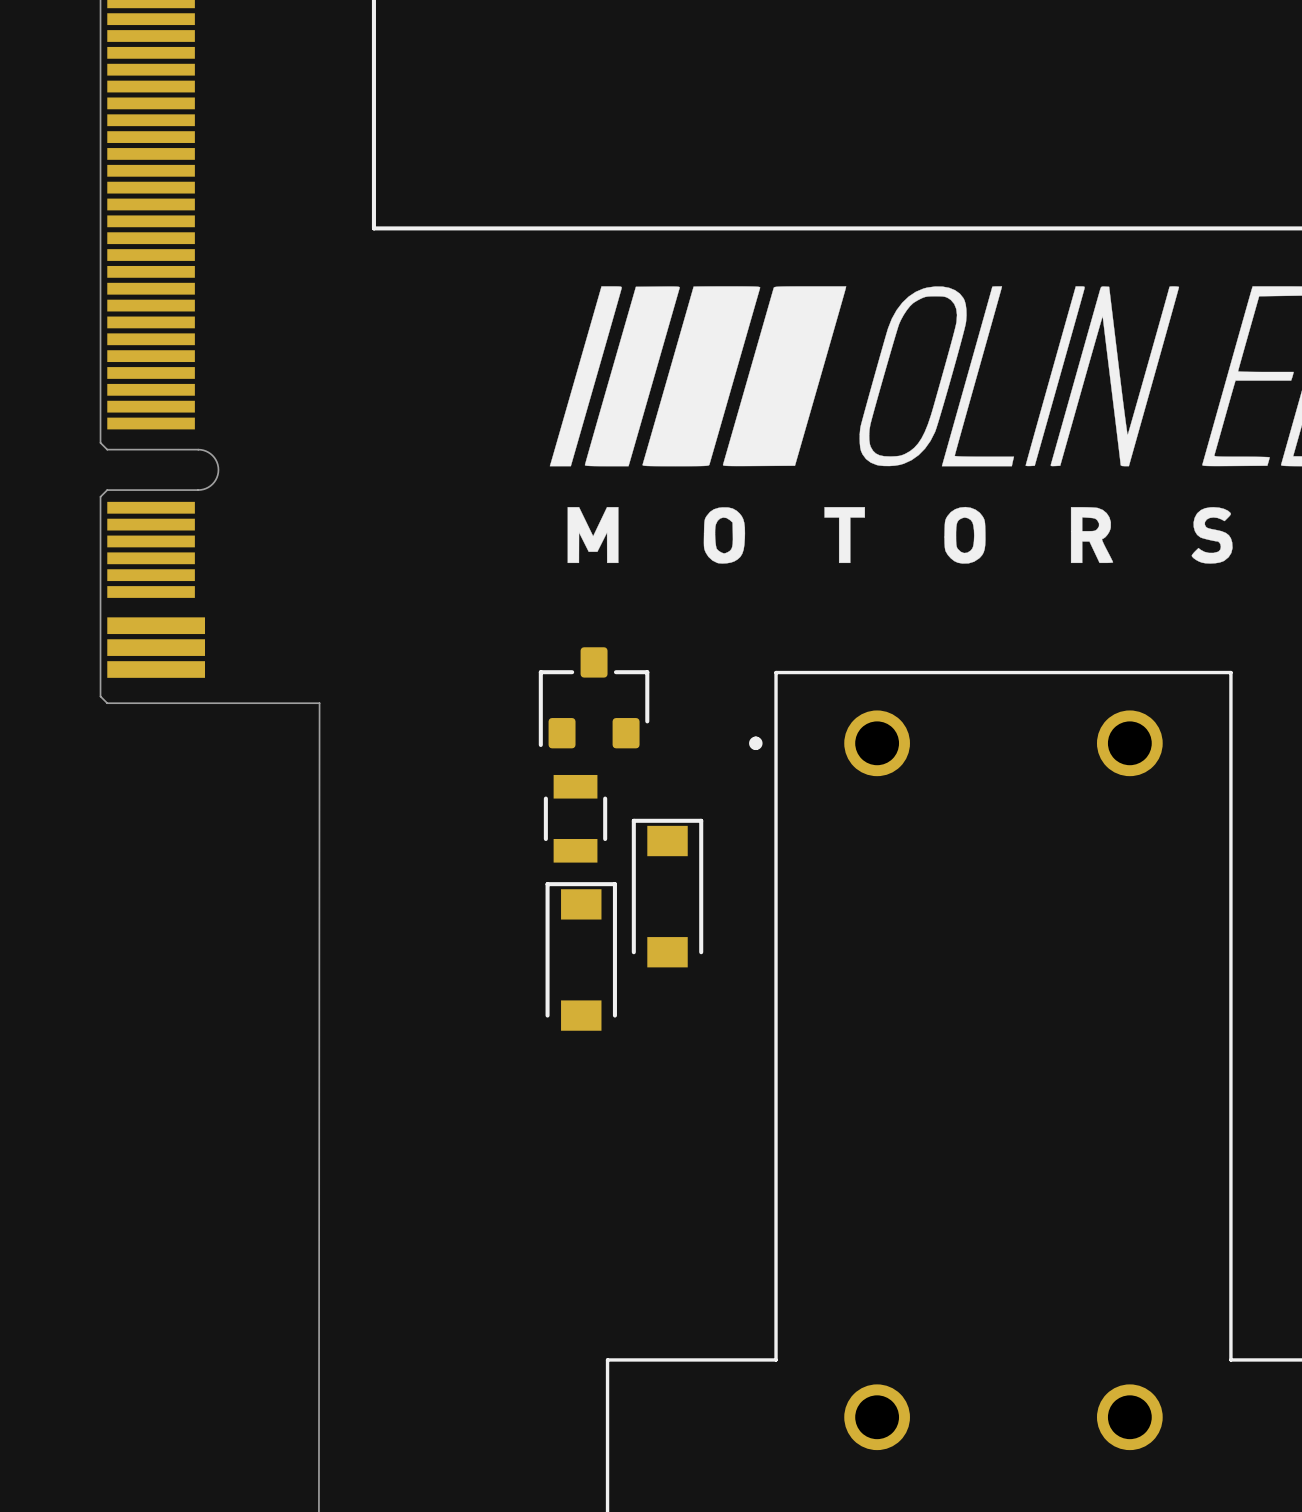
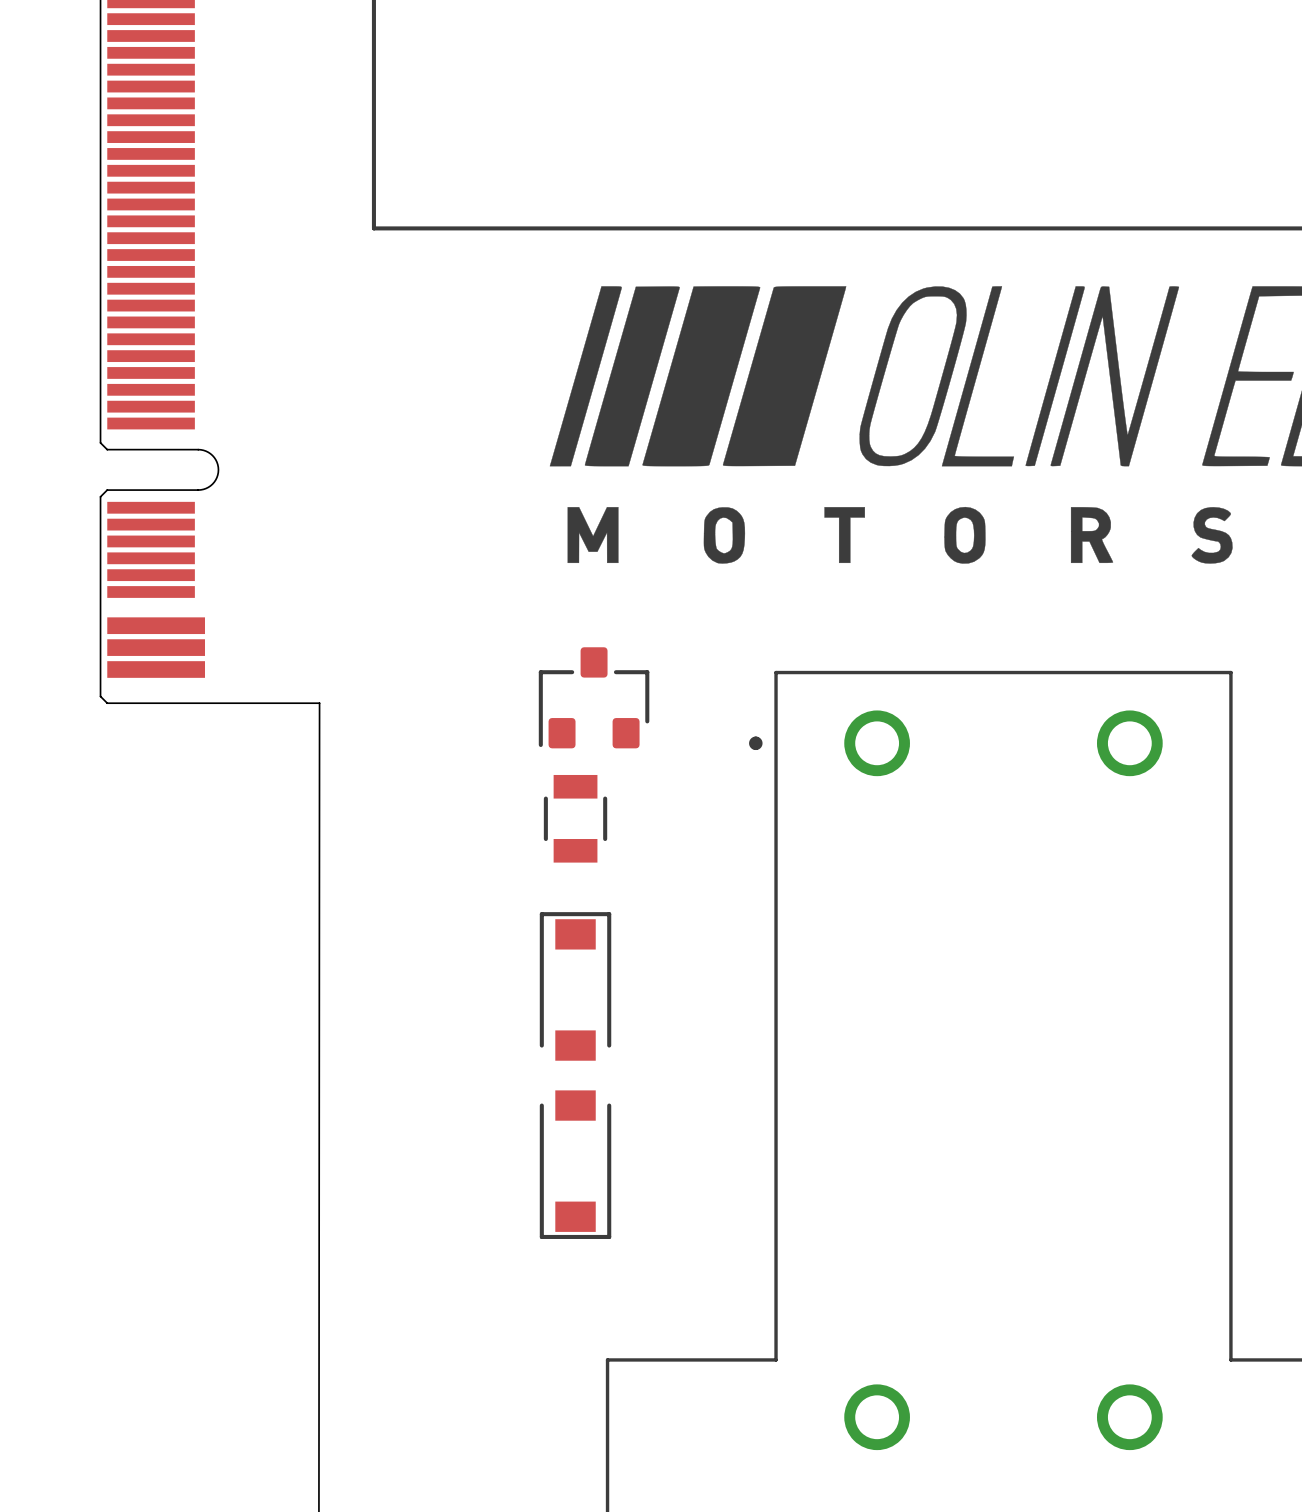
part rotation: 0° (667, 893) -> 180° (575, 1164)
part position: (667, 893) -> (575, 1164)
part position: (581, 956) -> (575, 986)

